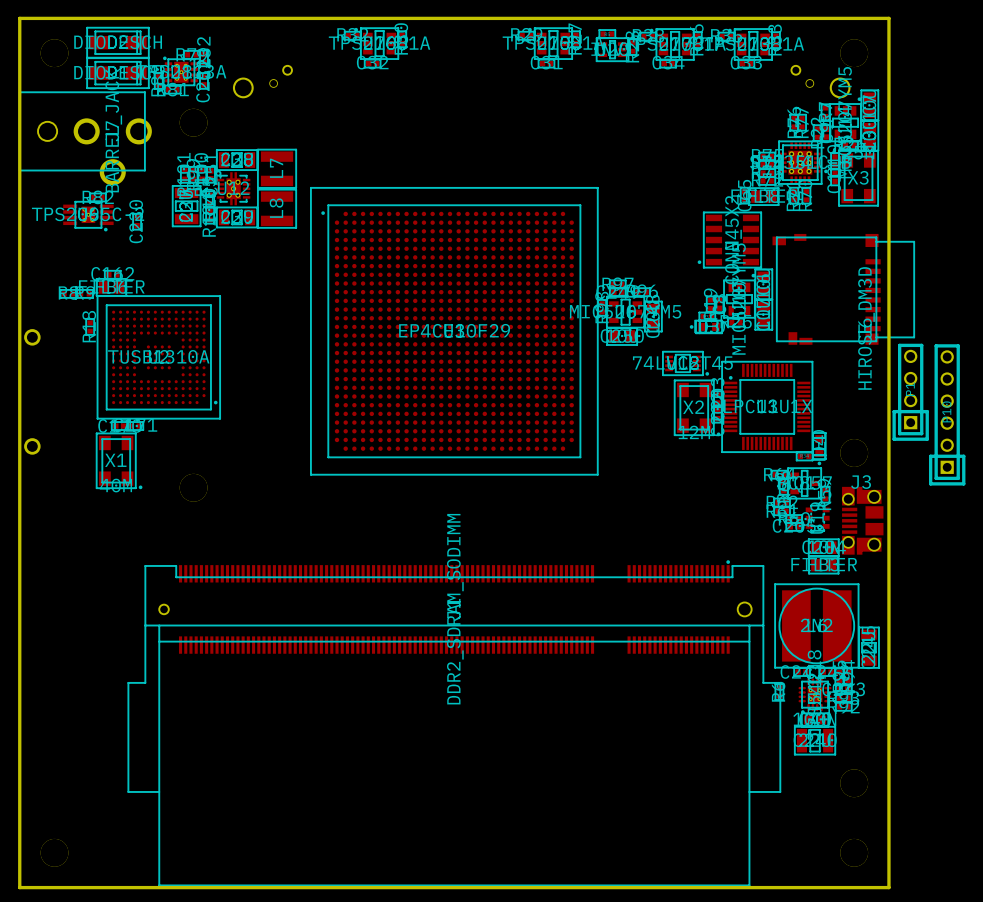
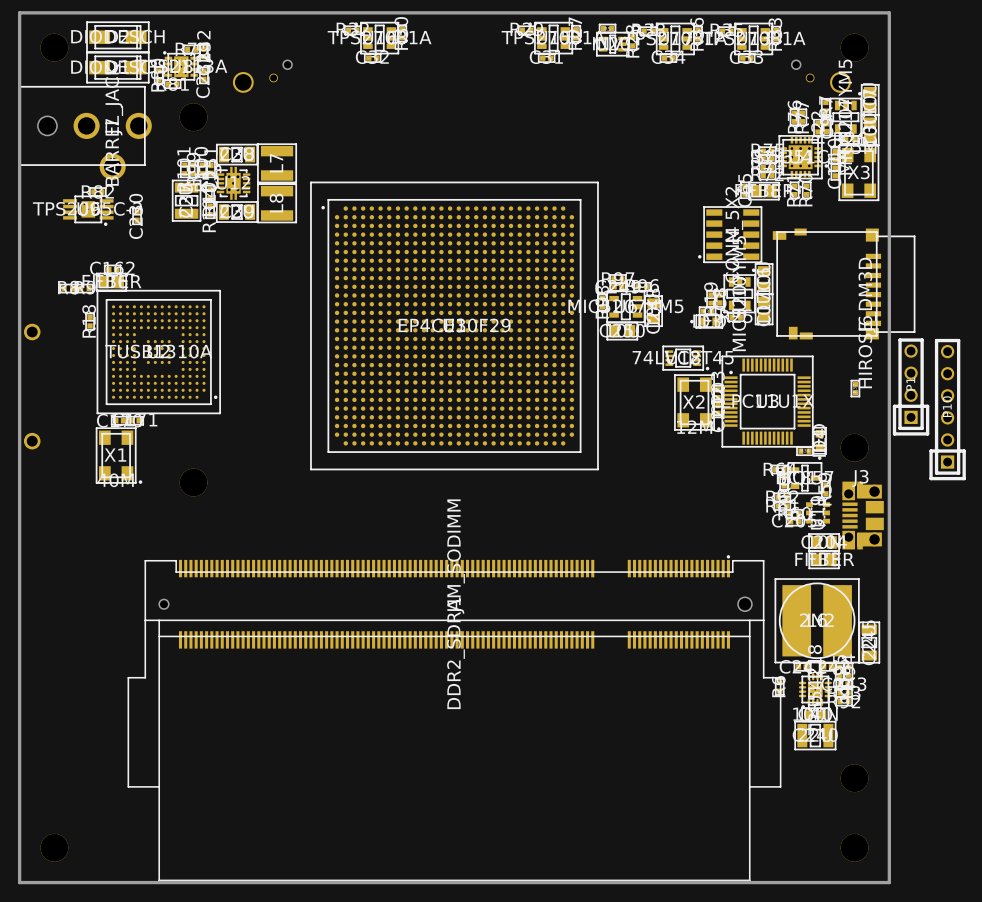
part: none -> (855, 388)

